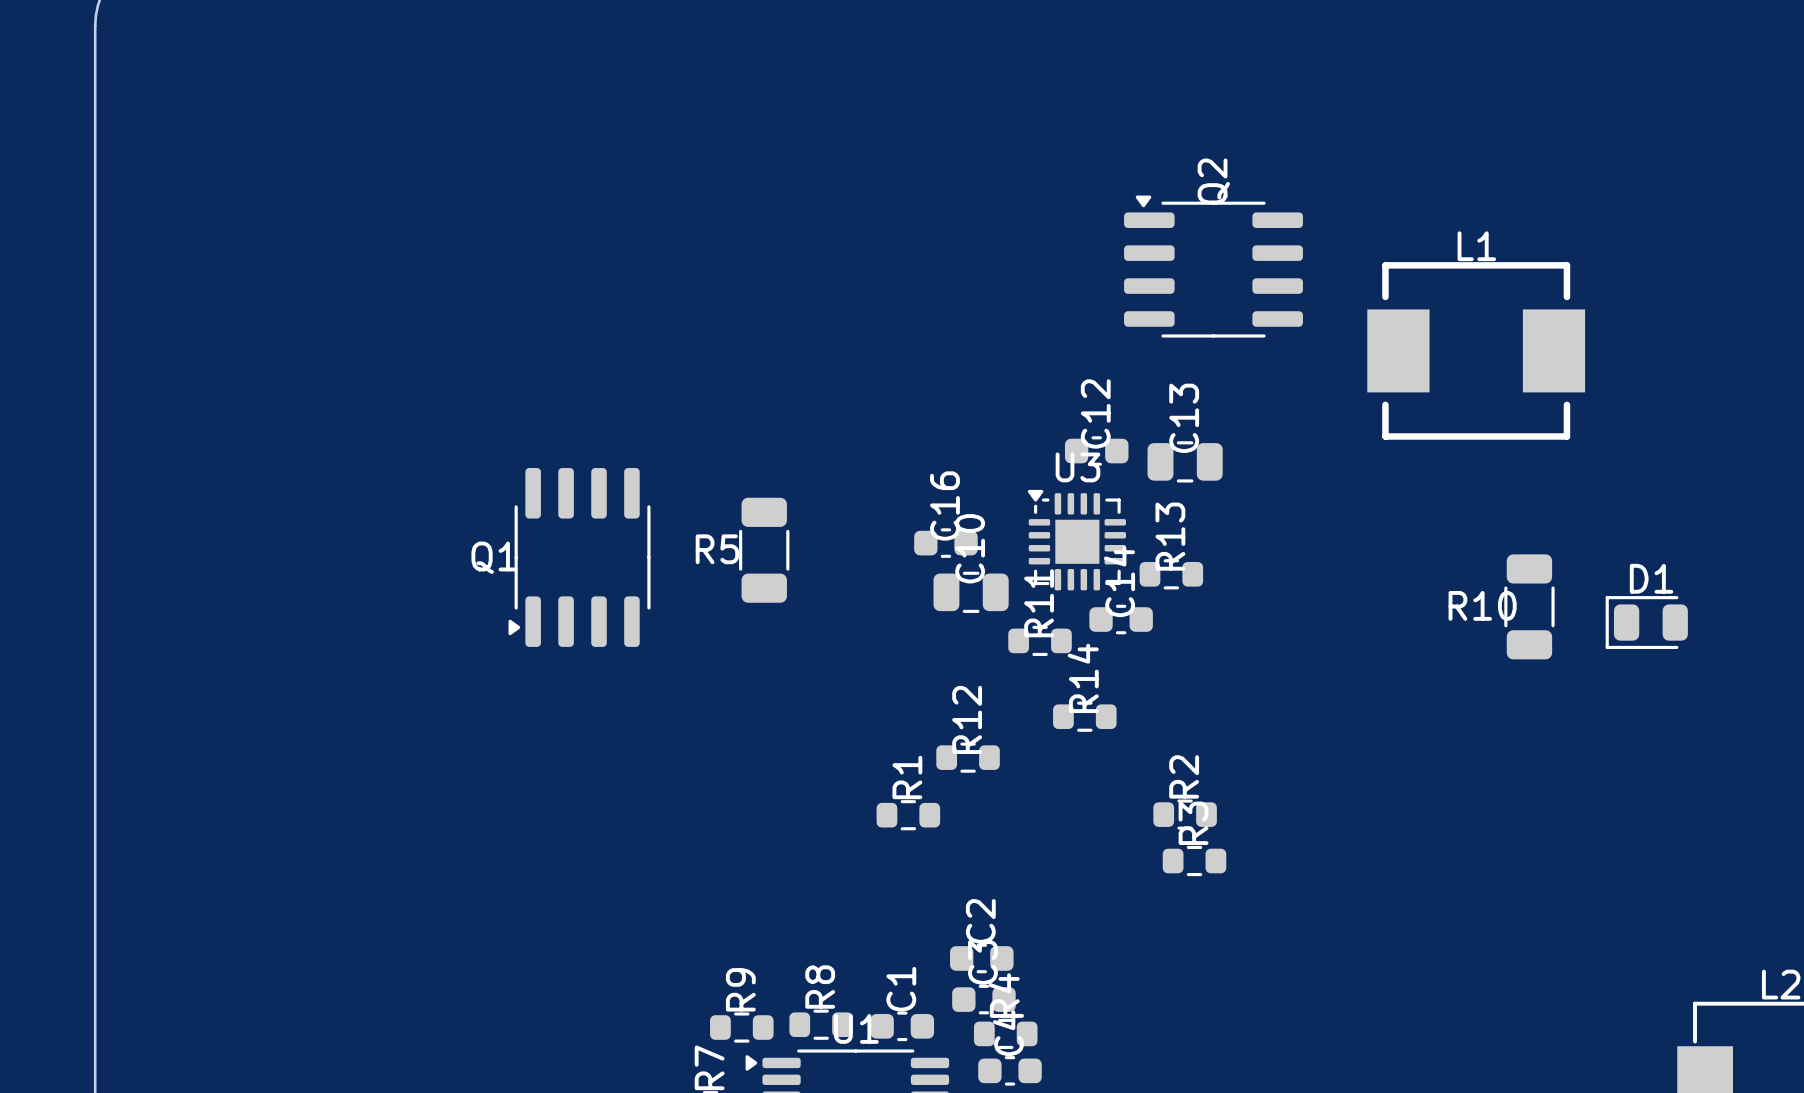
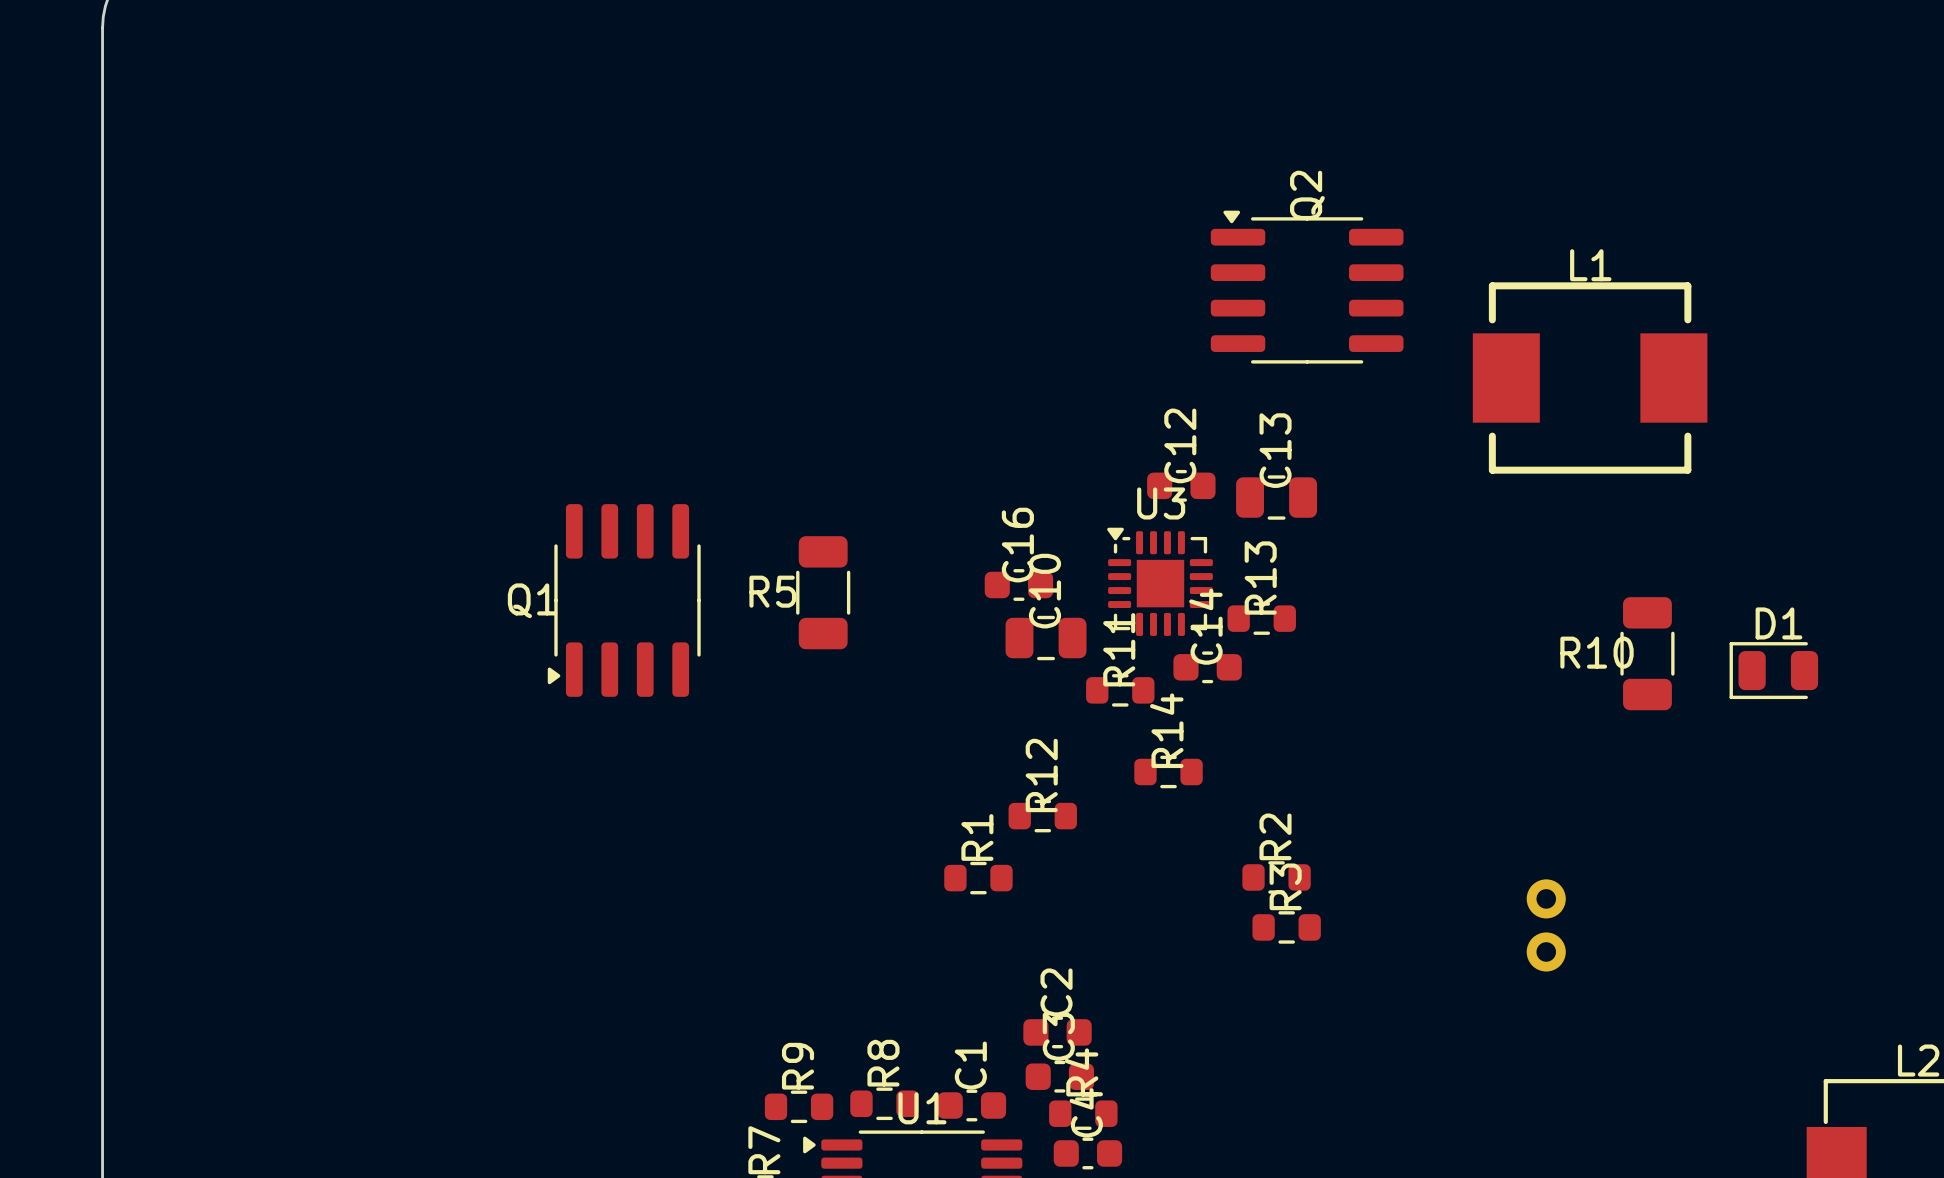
part: none -> (1546, 925)

